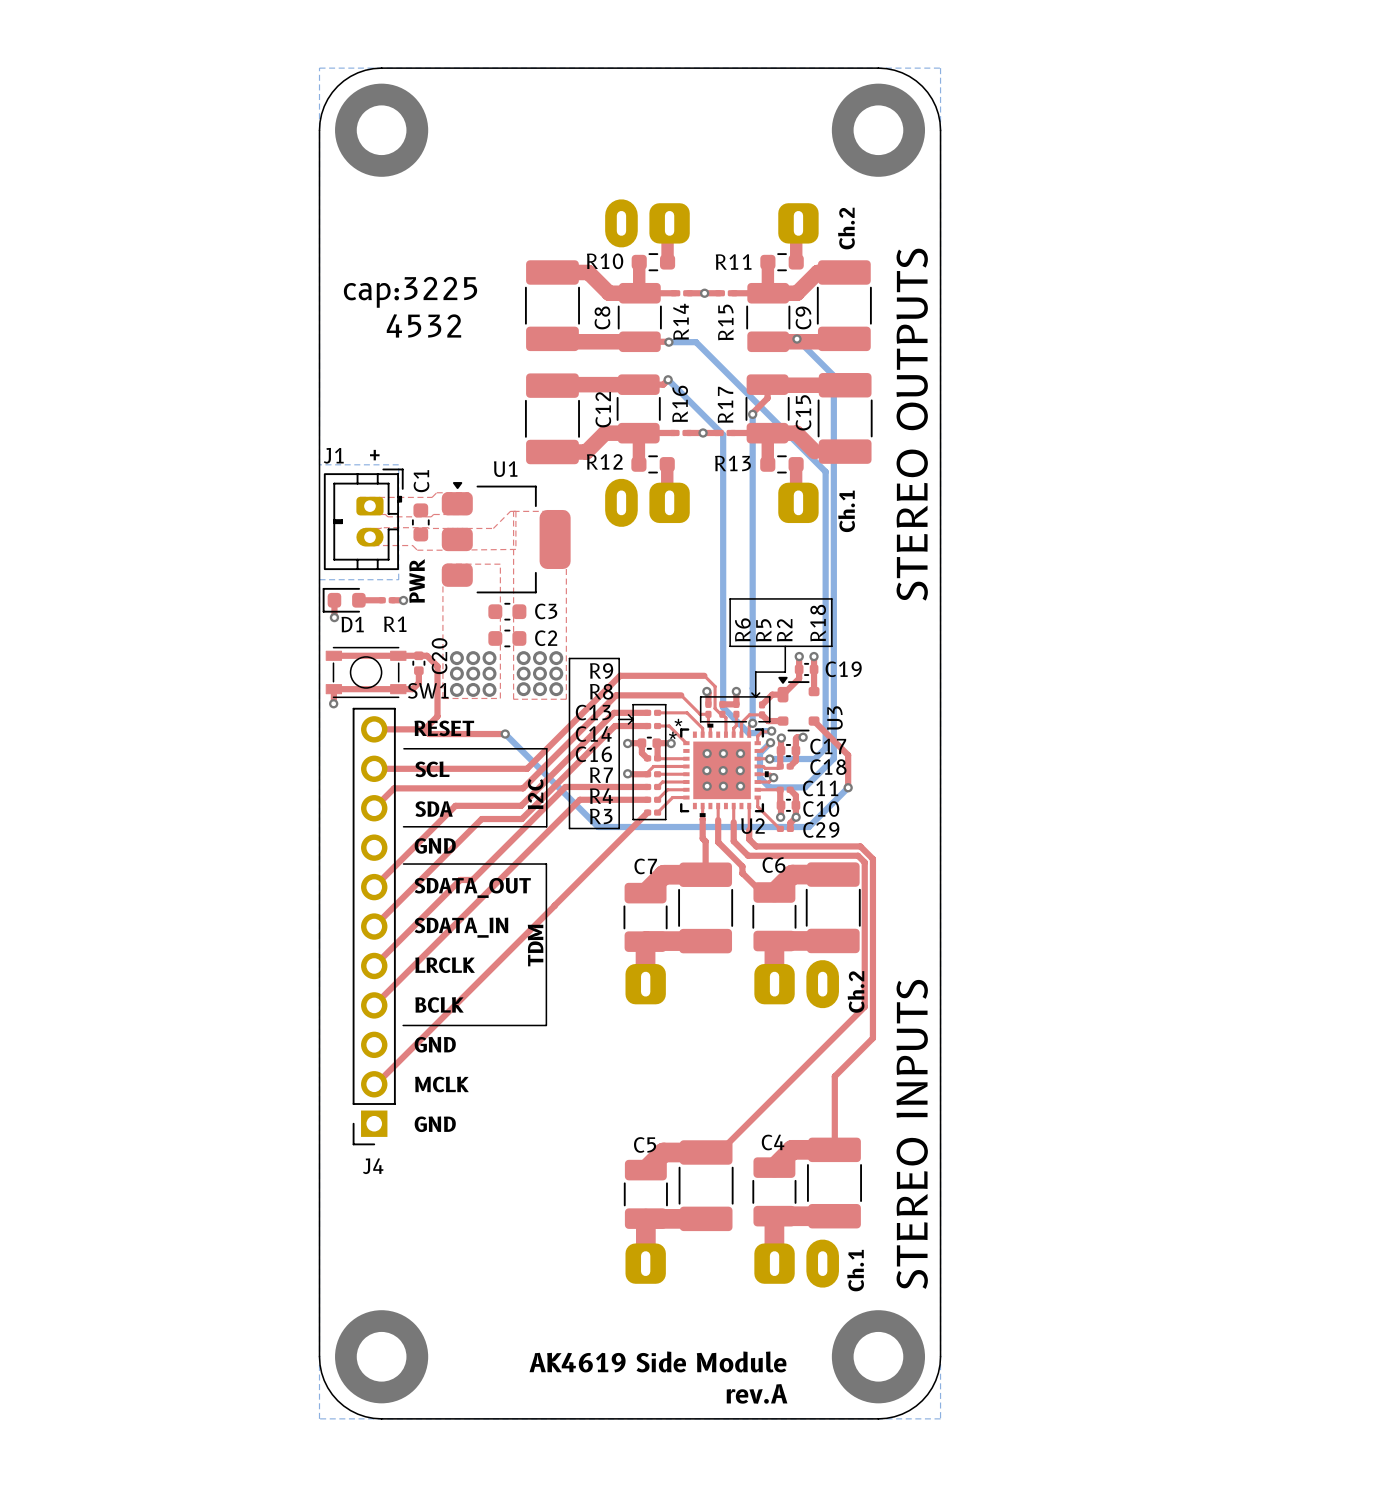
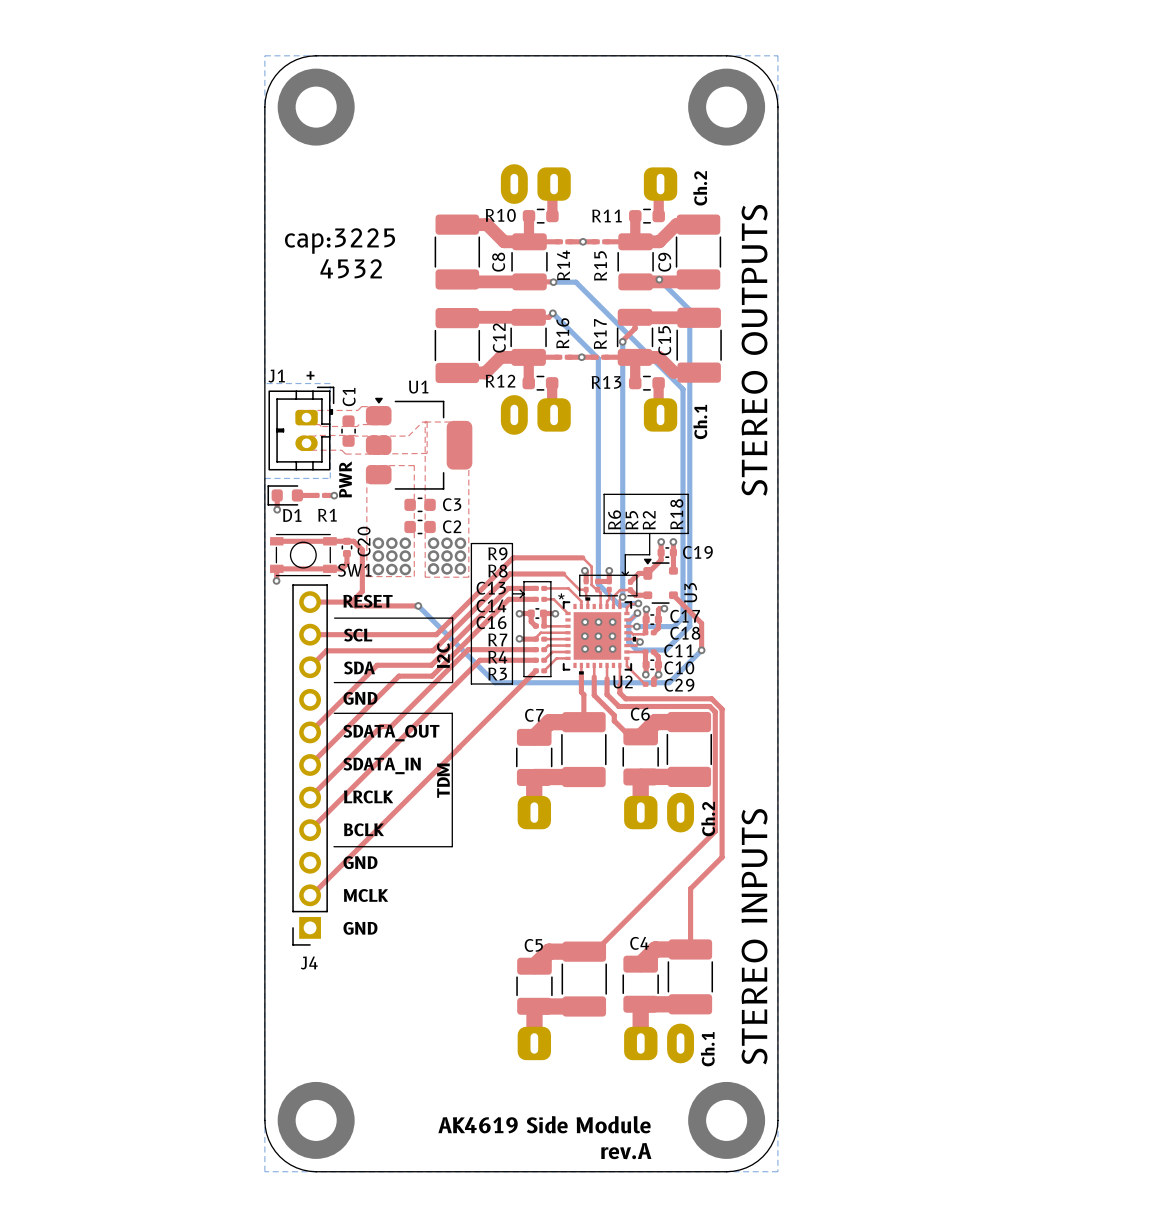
U2 text: * (672, 735) -> none

